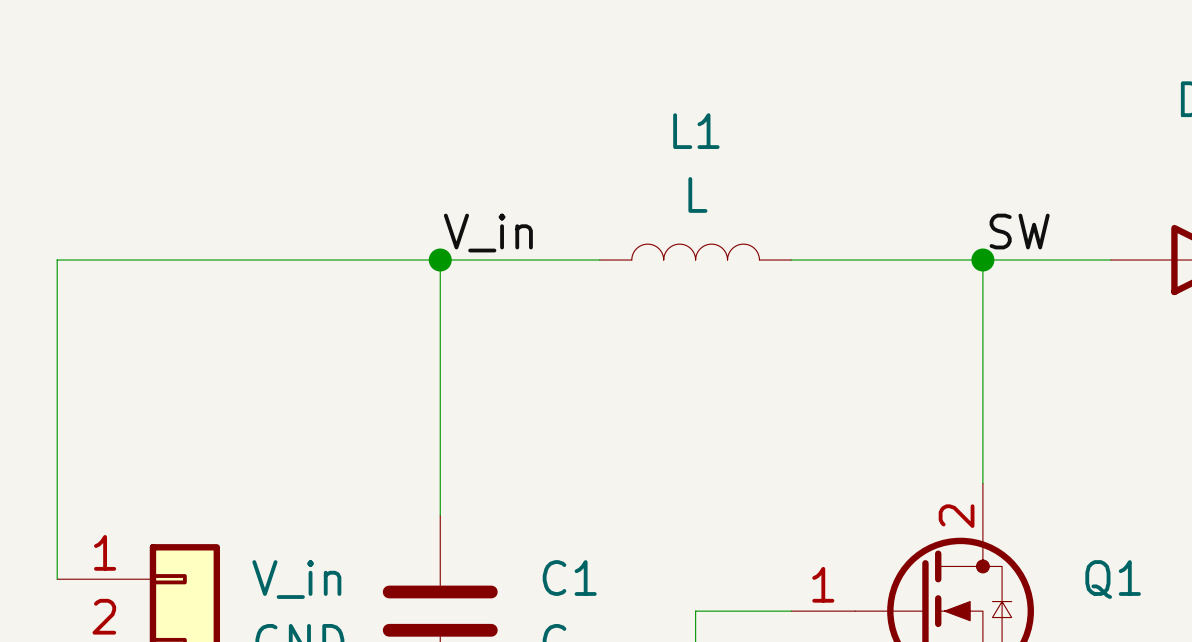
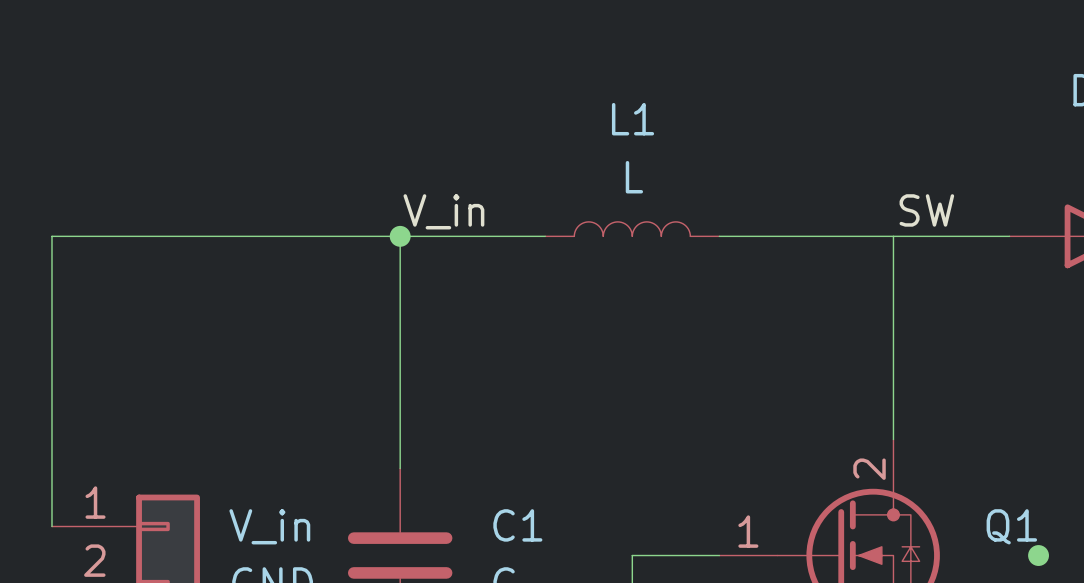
junction: (982, 260) -> none
junction: none -> (1038, 555)

